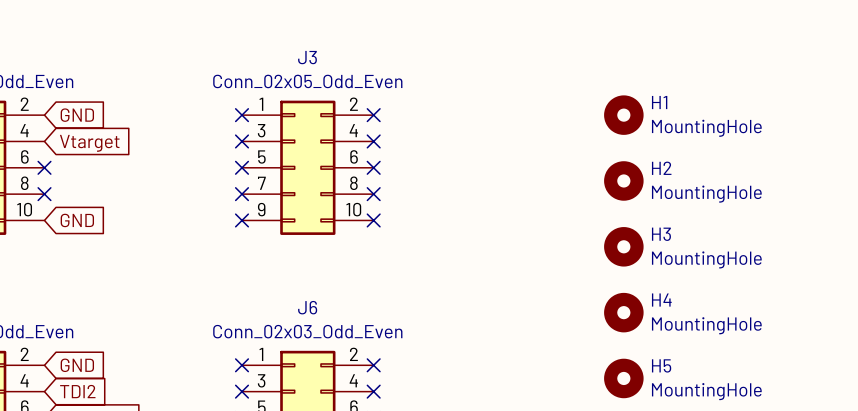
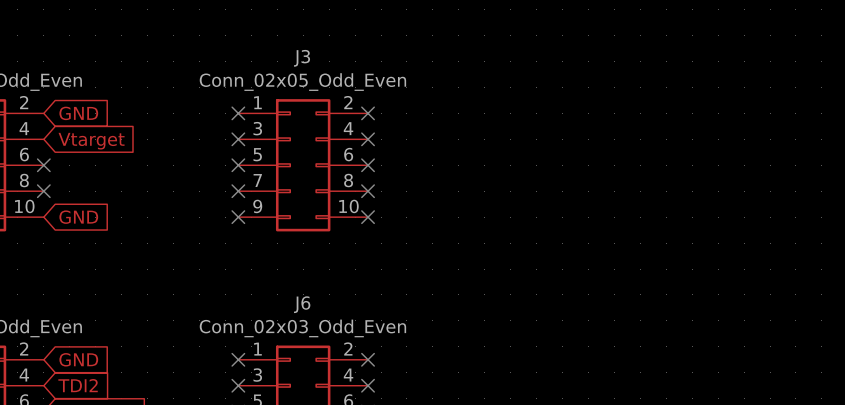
H1: MountingHole (623, 115) -> none
H2: MountingHole (623, 180) -> none
H3: MountingHole (623, 246) -> none
H4: MountingHole (623, 312) -> none
H5: MountingHole (623, 378) -> none

